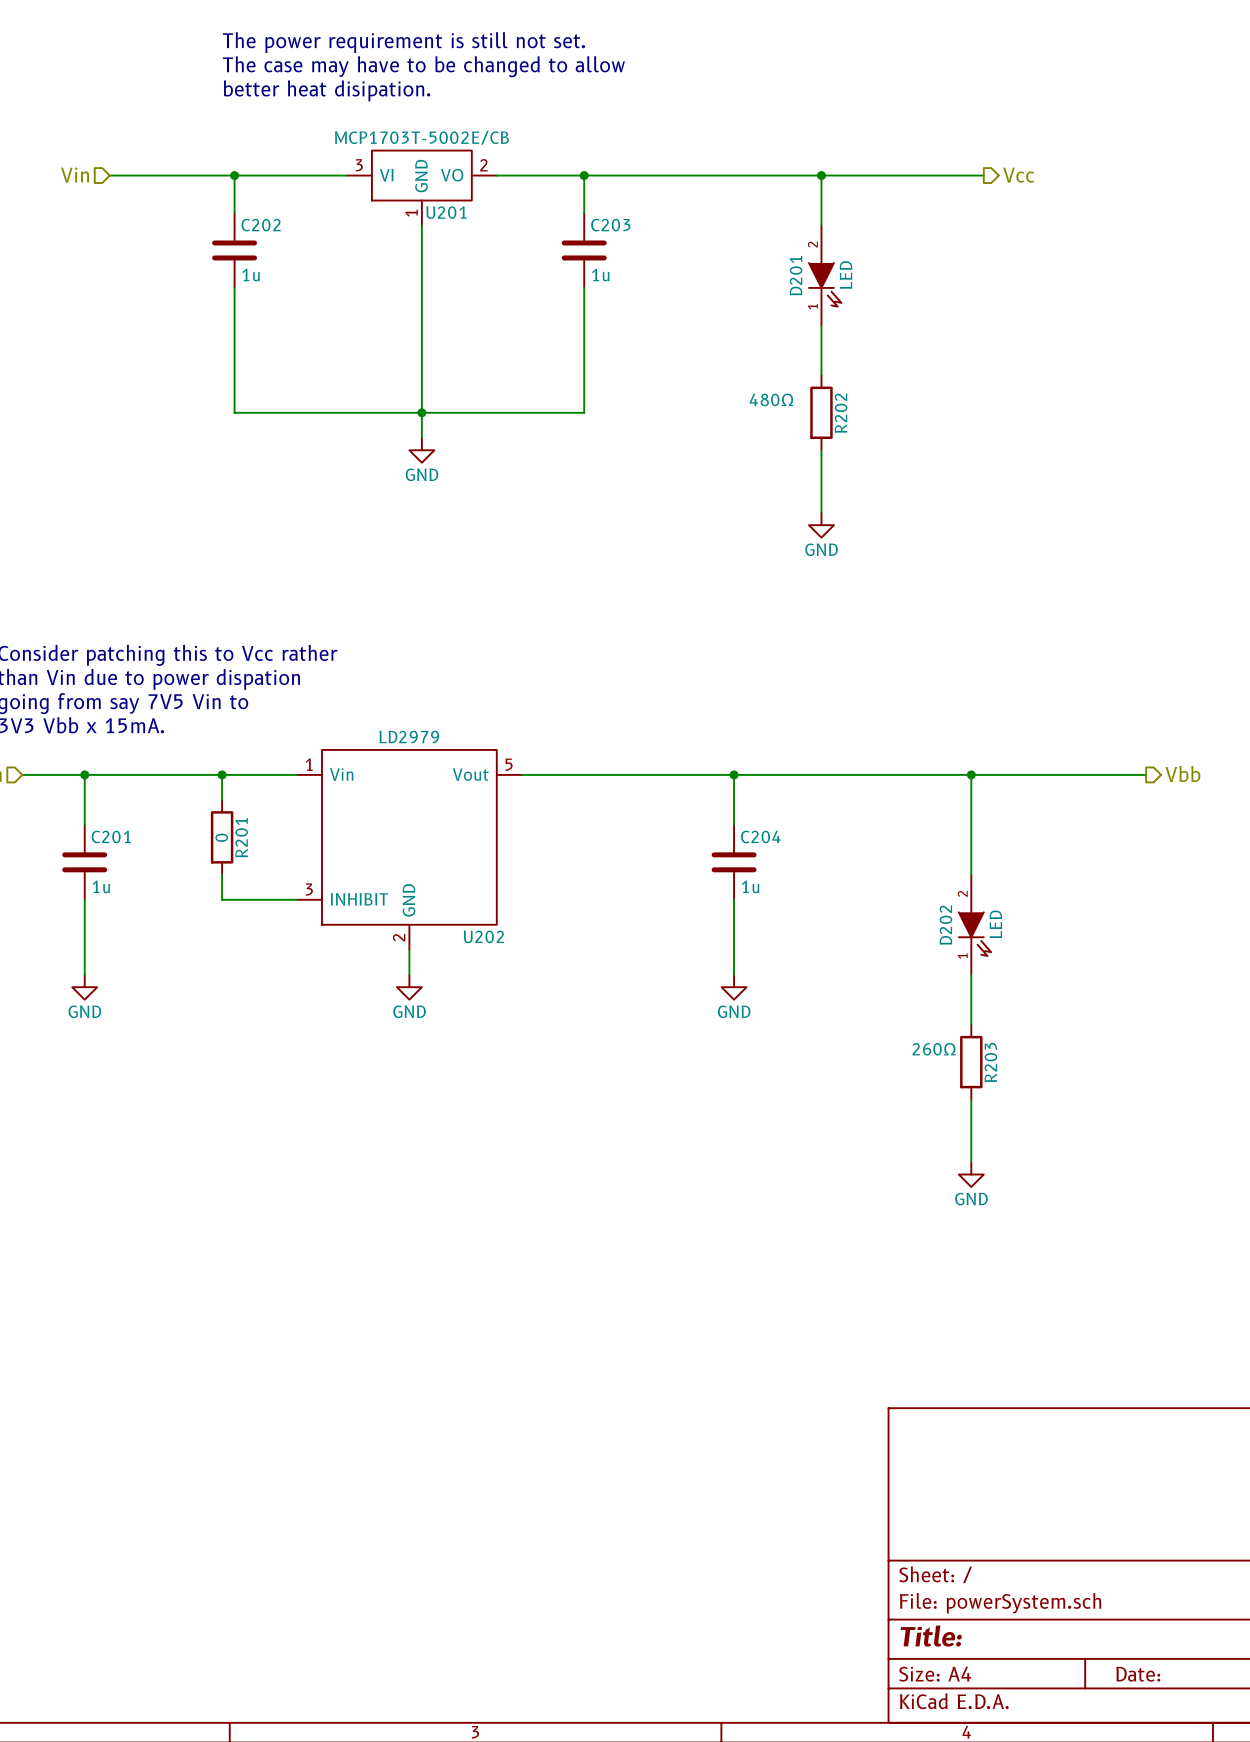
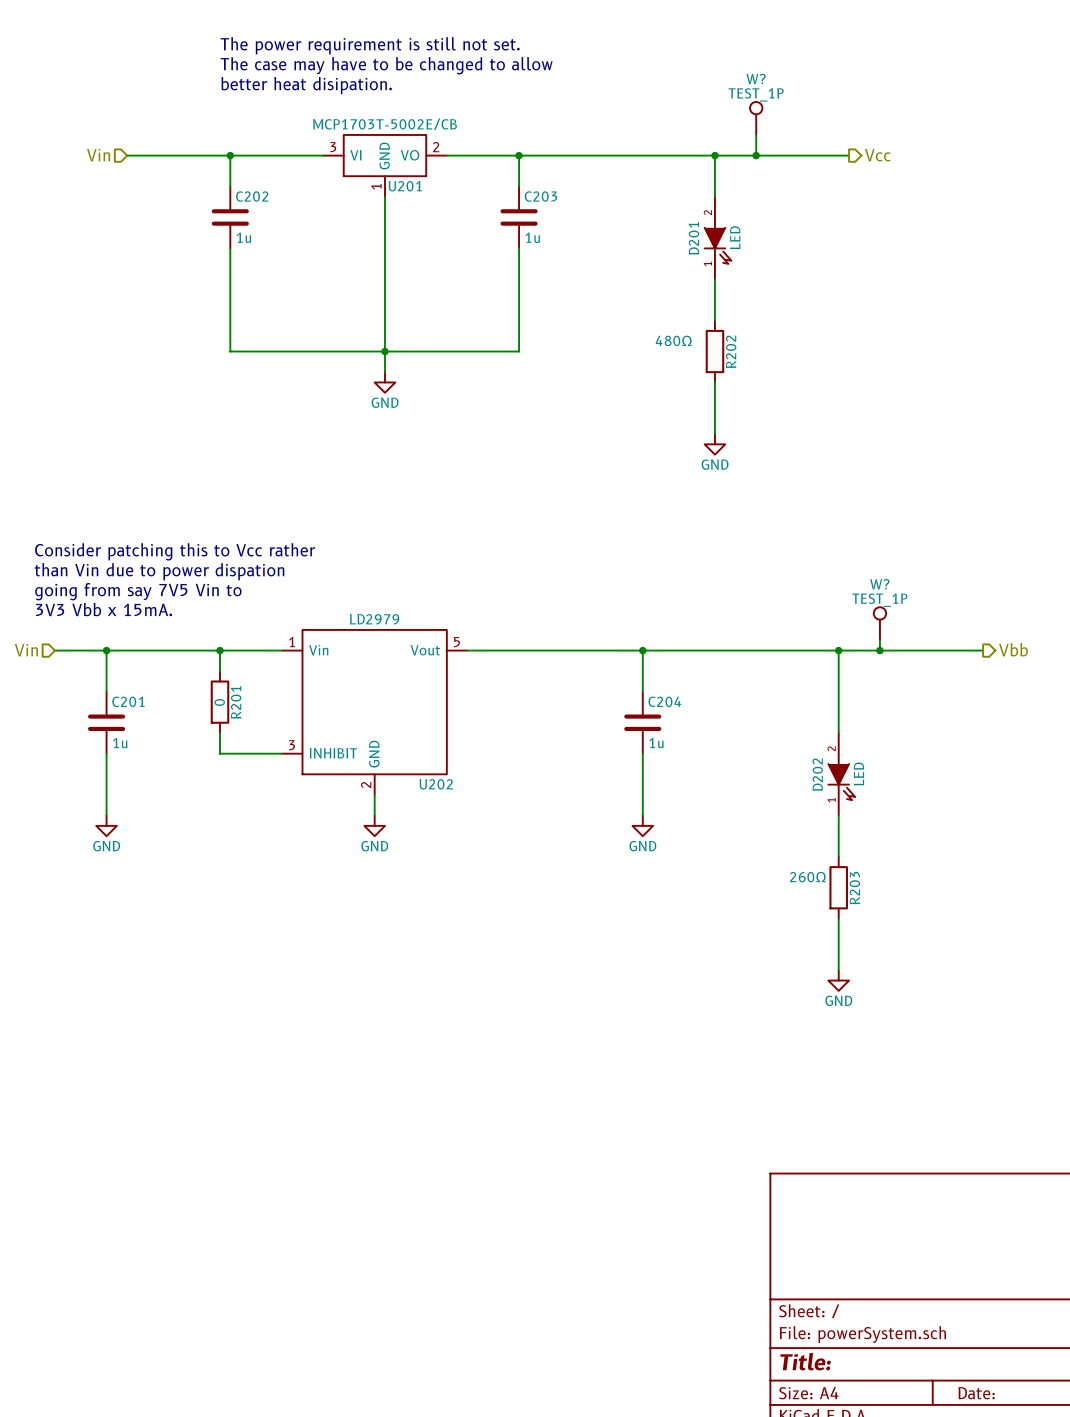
W?: none -> TEST_1P (756, 118)
wire: none -> (756, 134) (756, 155)
junction: none -> (756, 155)
W?: none -> TEST_1P (879, 623)
wire: none -> (879, 640) (879, 650)
junction: none -> (879, 650)

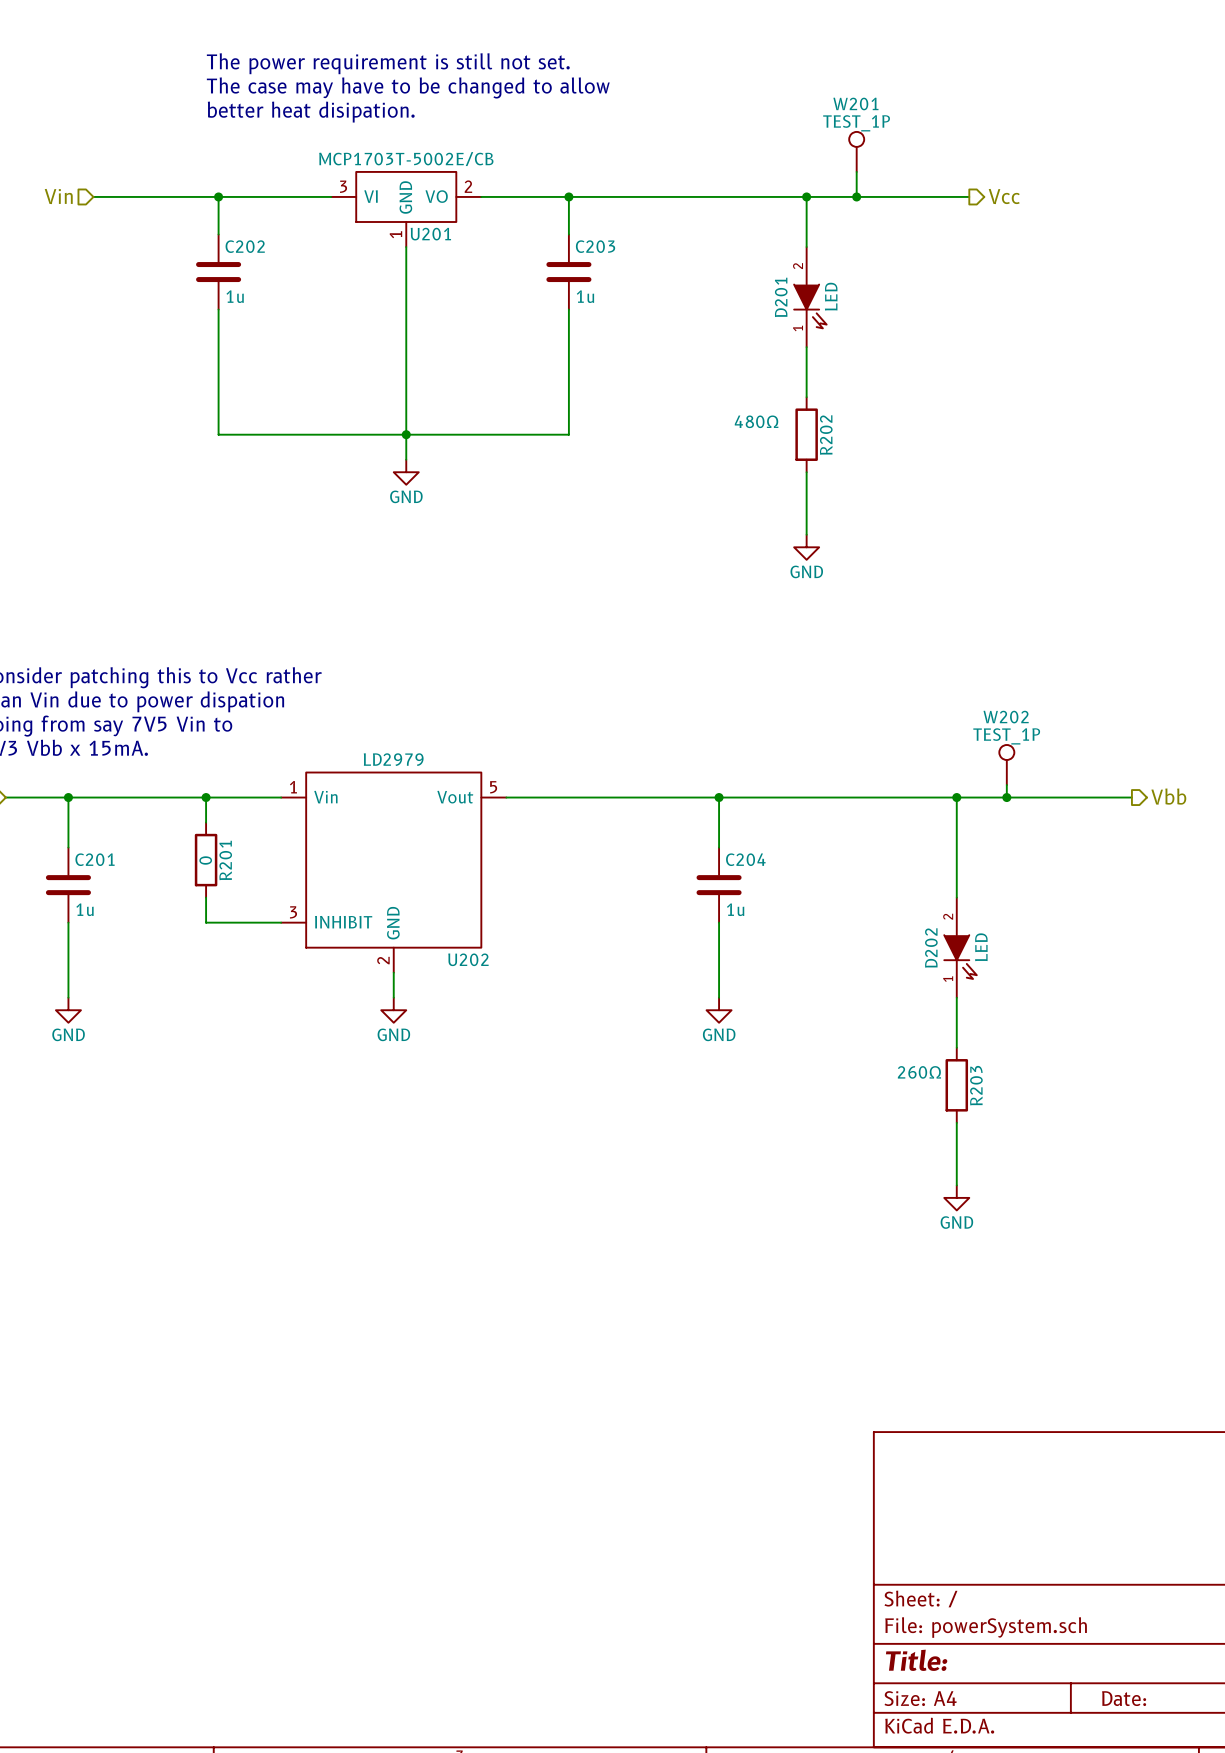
W? name: W? (756, 78) -> W201 (855, 103)
W? name: W? (879, 584) -> W202 (1006, 717)

